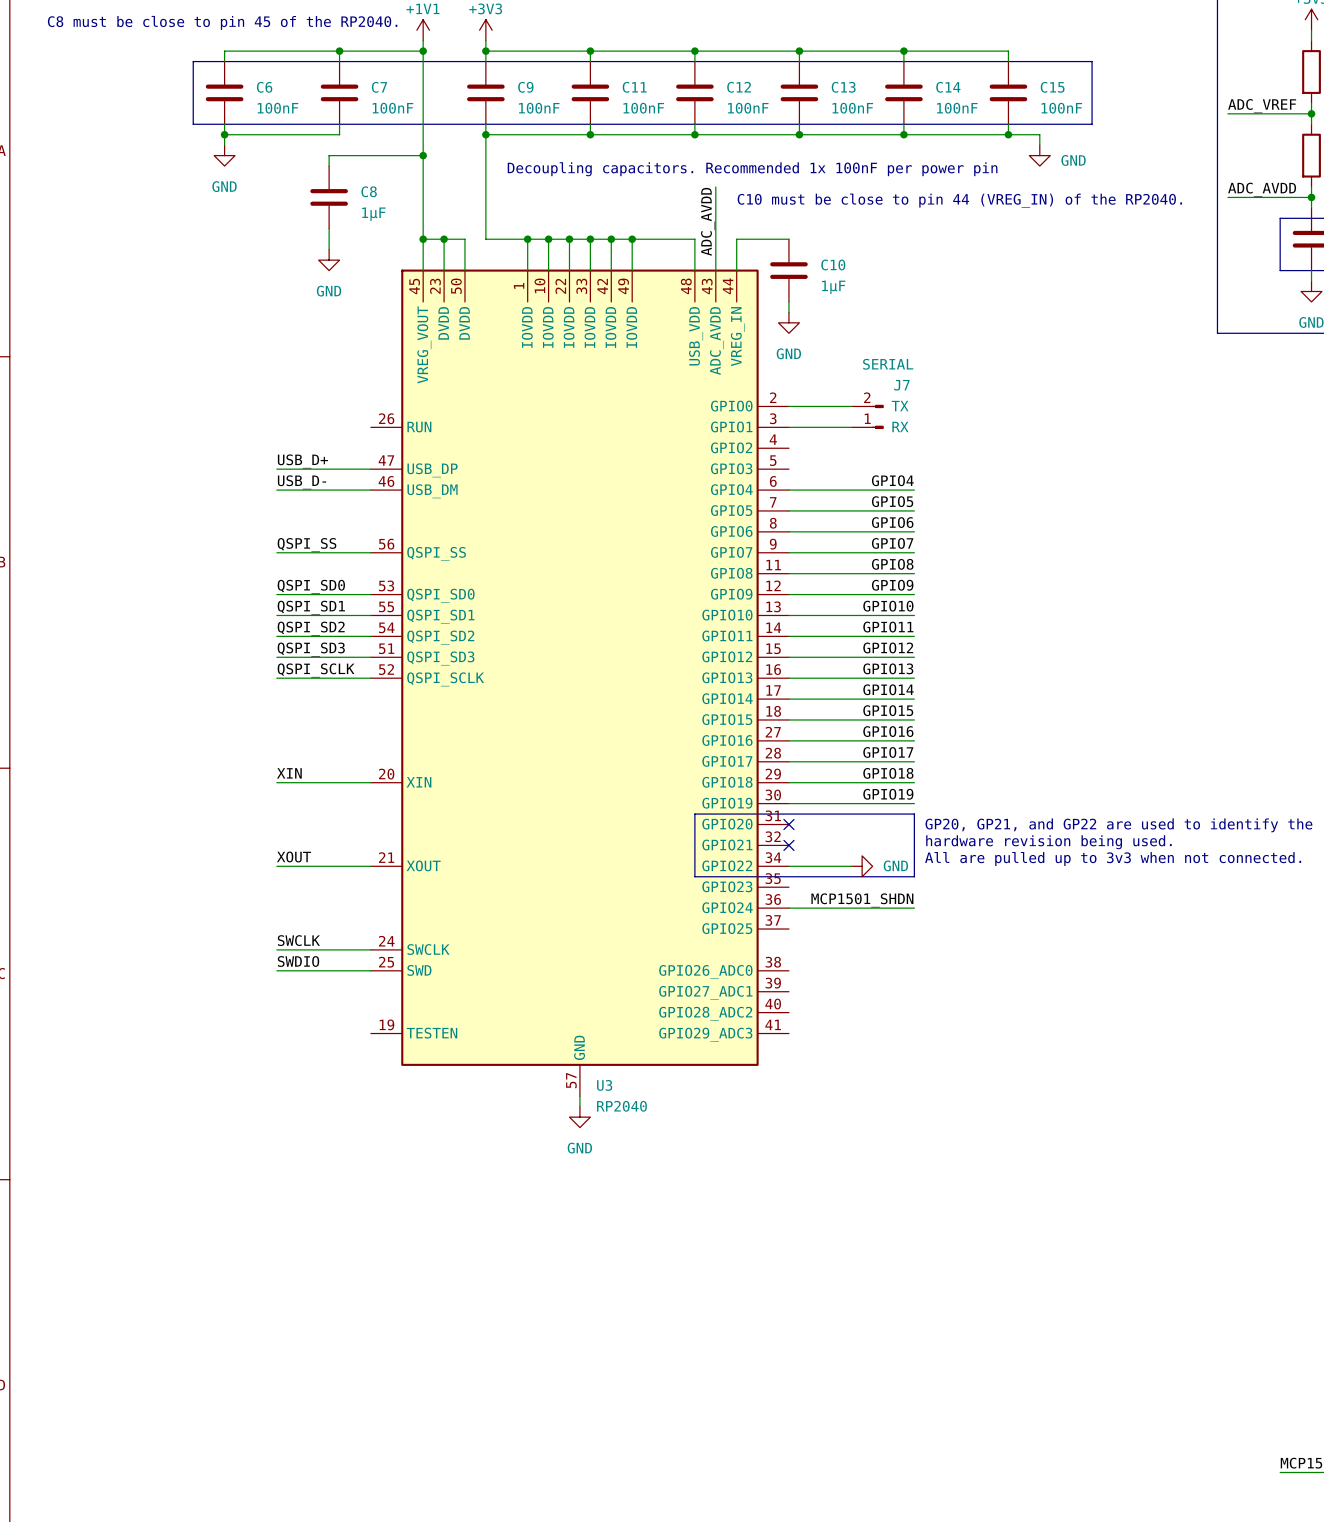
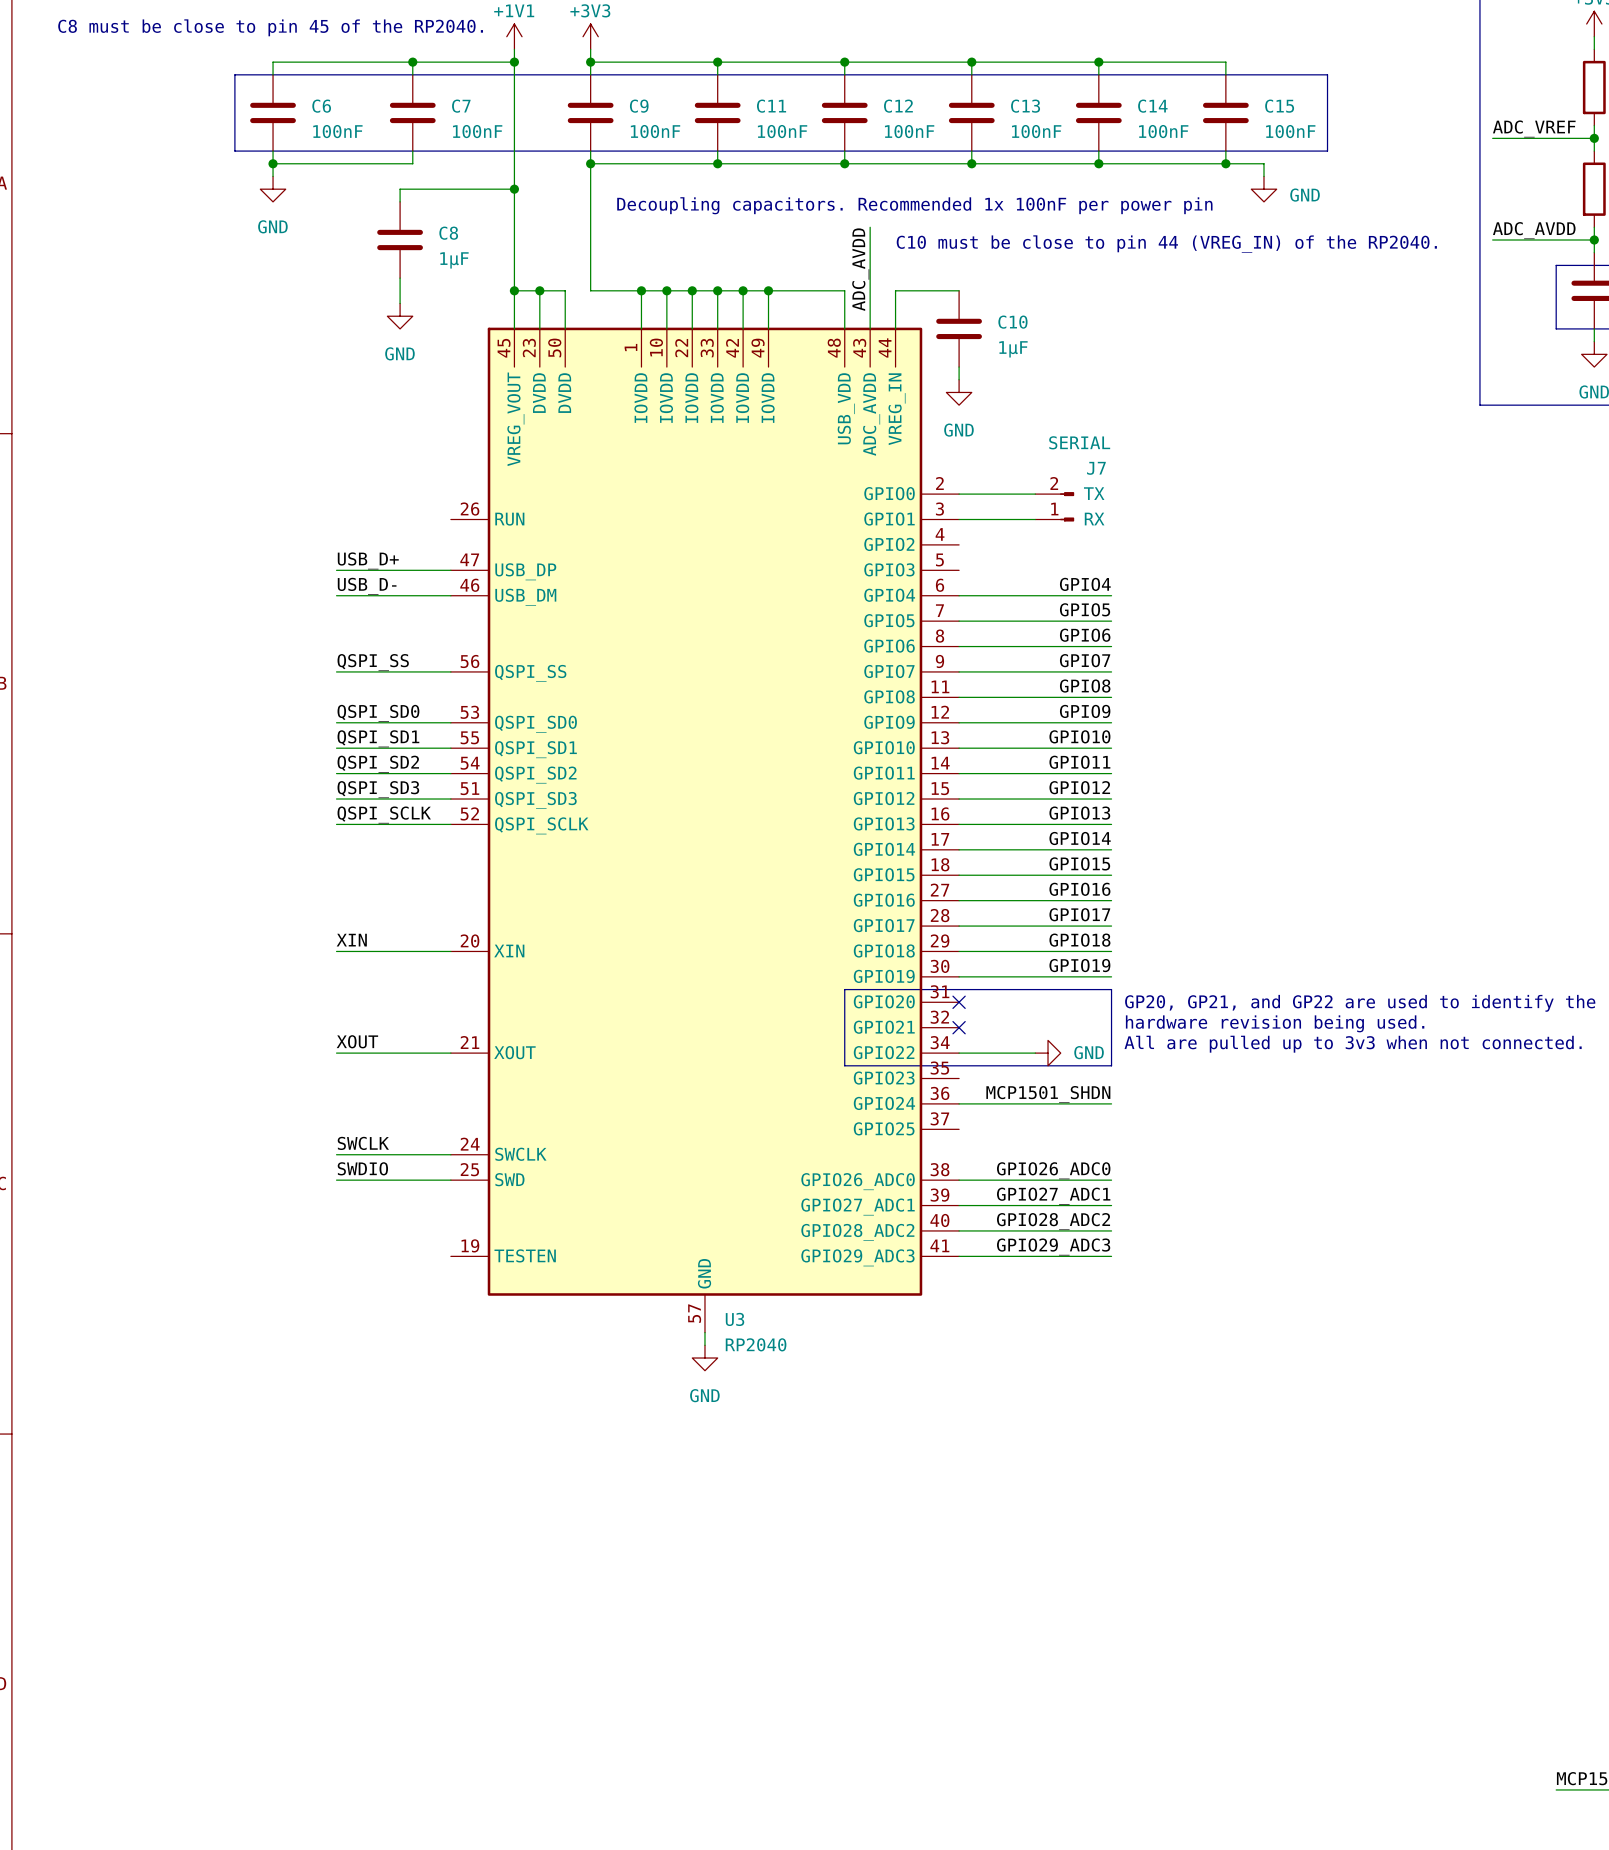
label: none -> GPIO26_ADC0 (1053, 1170)
wire: none -> (959, 1180) (1111, 1180)
label: none -> GPIO27_ADC1 (1053, 1196)
wire: none -> (959, 1205) (1111, 1205)
label: none -> GPIO28_ADC2 (1053, 1221)
wire: none -> (959, 1230) (1111, 1230)
label: none -> GPIO29_ADC3 (1053, 1246)
wire: none -> (959, 1256) (1111, 1256)

